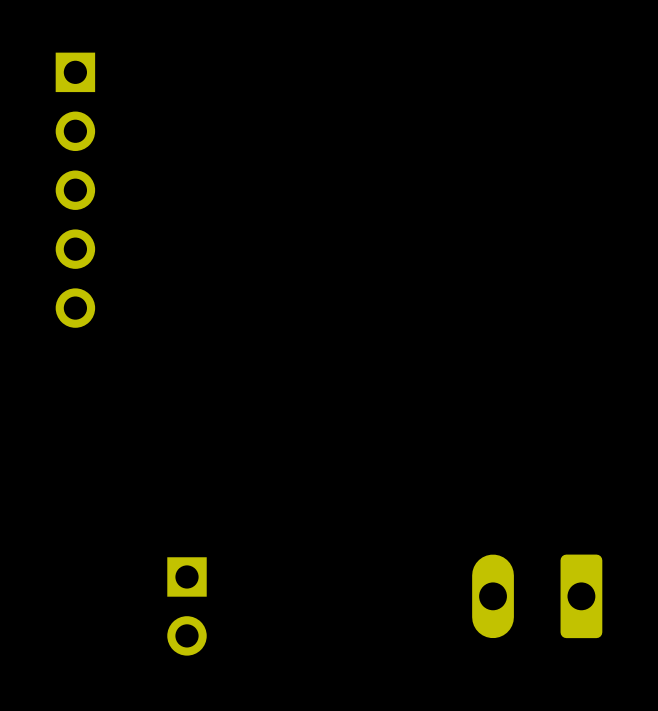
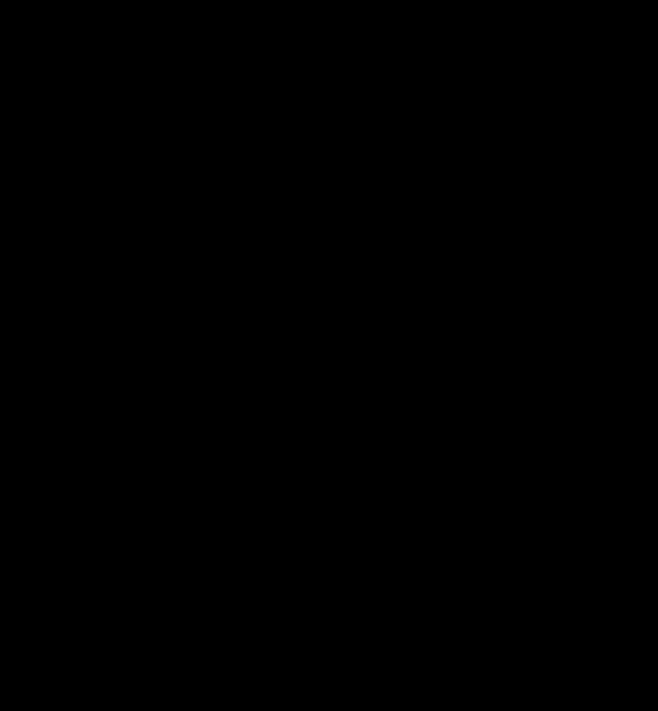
part: (75, 190) -> none
part: (537, 596) -> none
part: (187, 606) -> none

